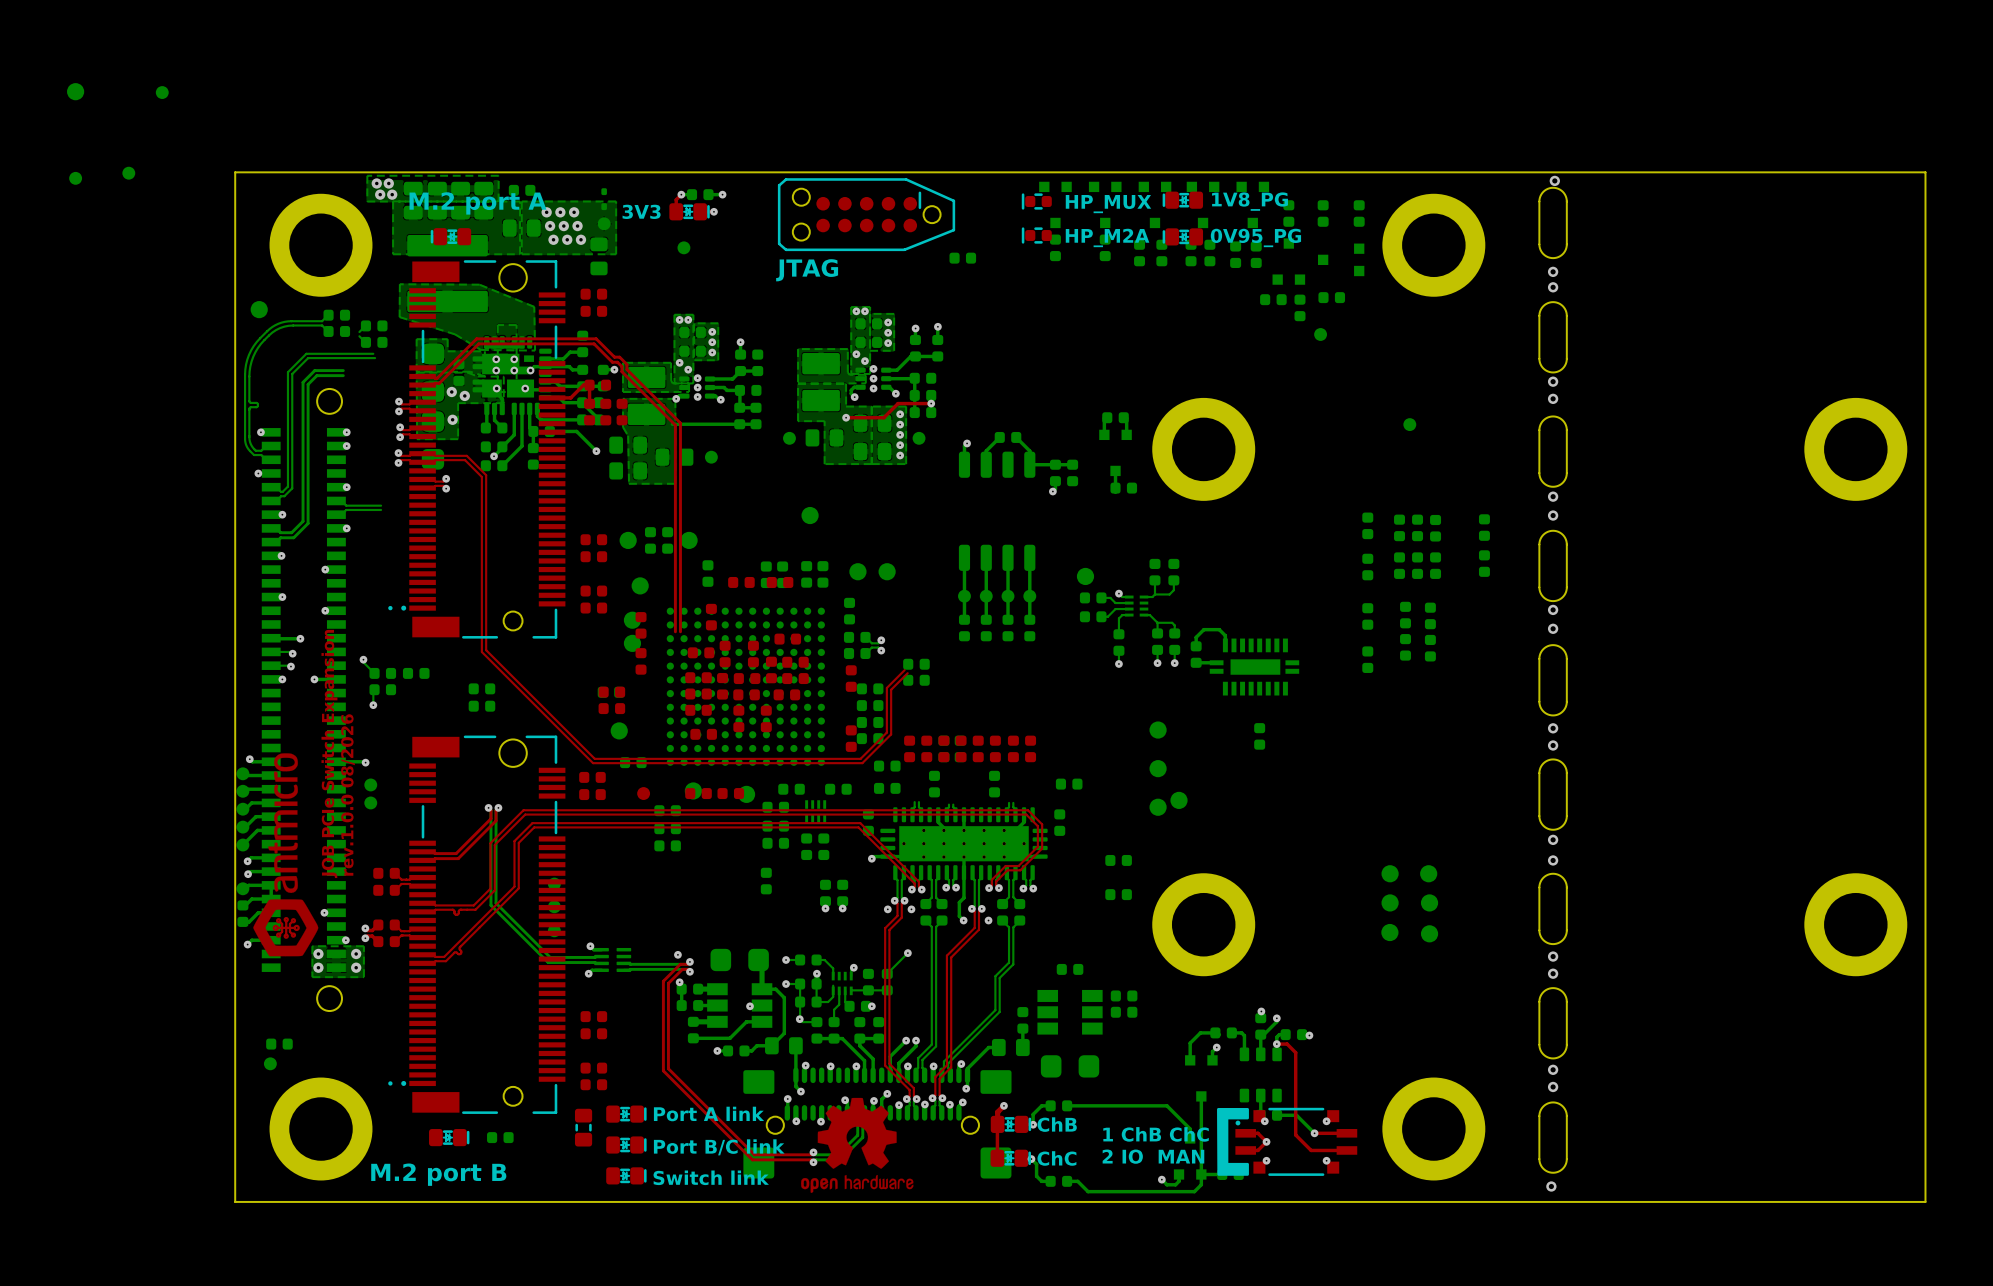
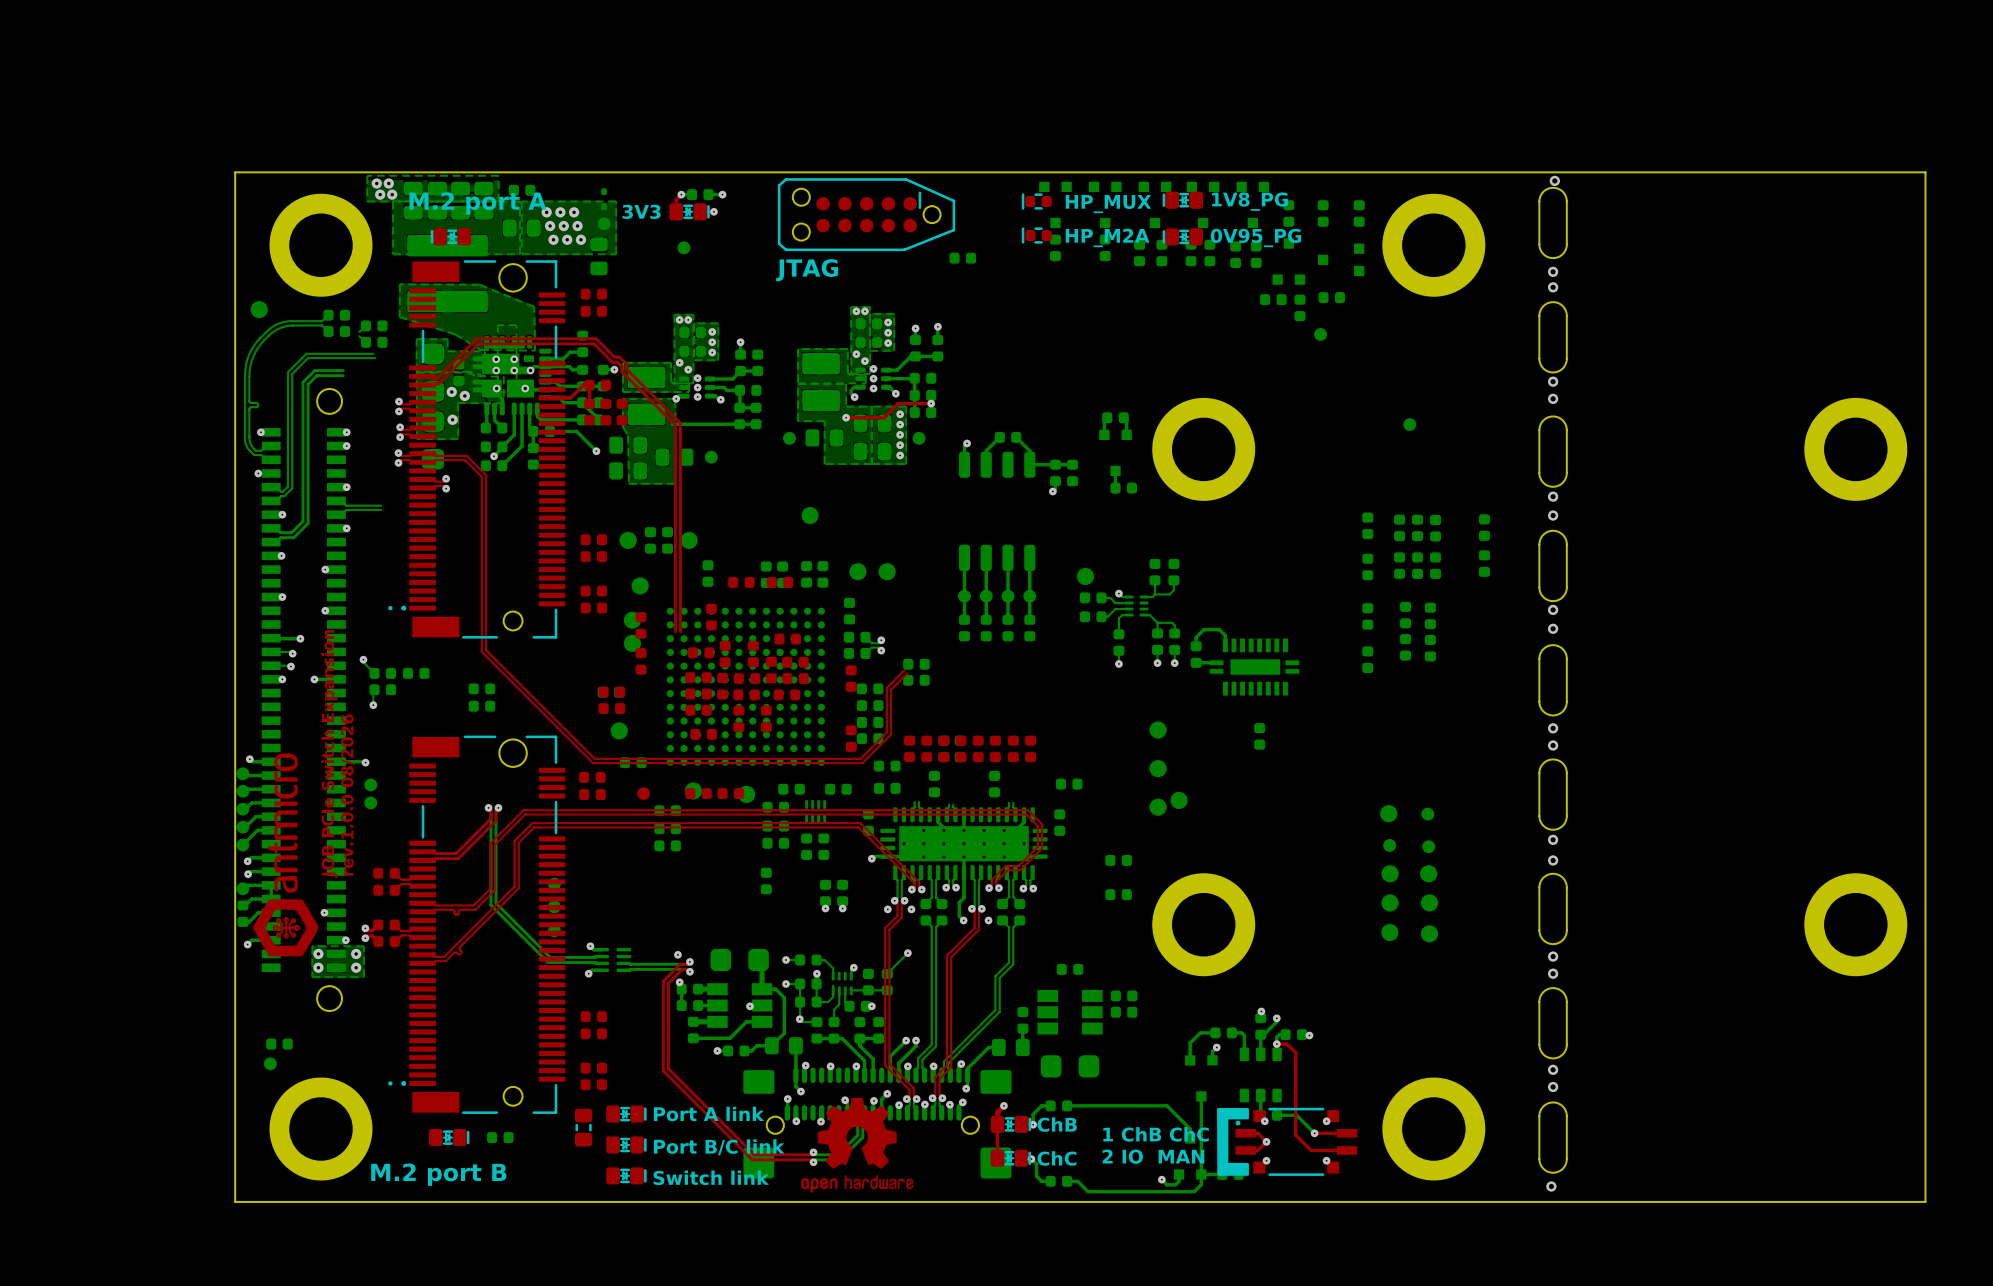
part: (75, 91) -> none
part: (162, 92) -> none
part: (128, 173) -> none
part: (75, 178) -> none
part: none -> (1388, 813)
part: none -> (1427, 814)
part: none -> (1389, 845)
part: none -> (1428, 846)

